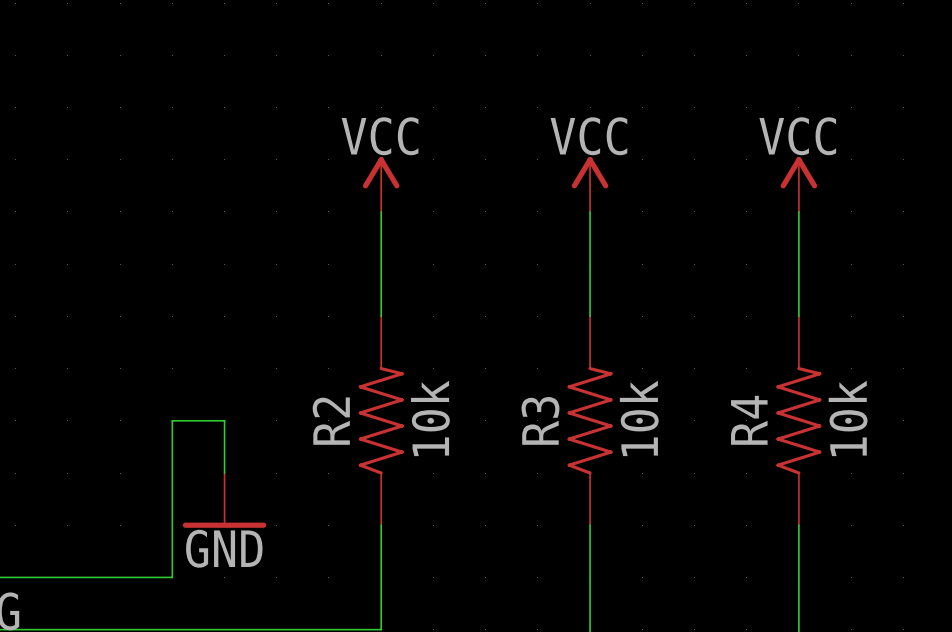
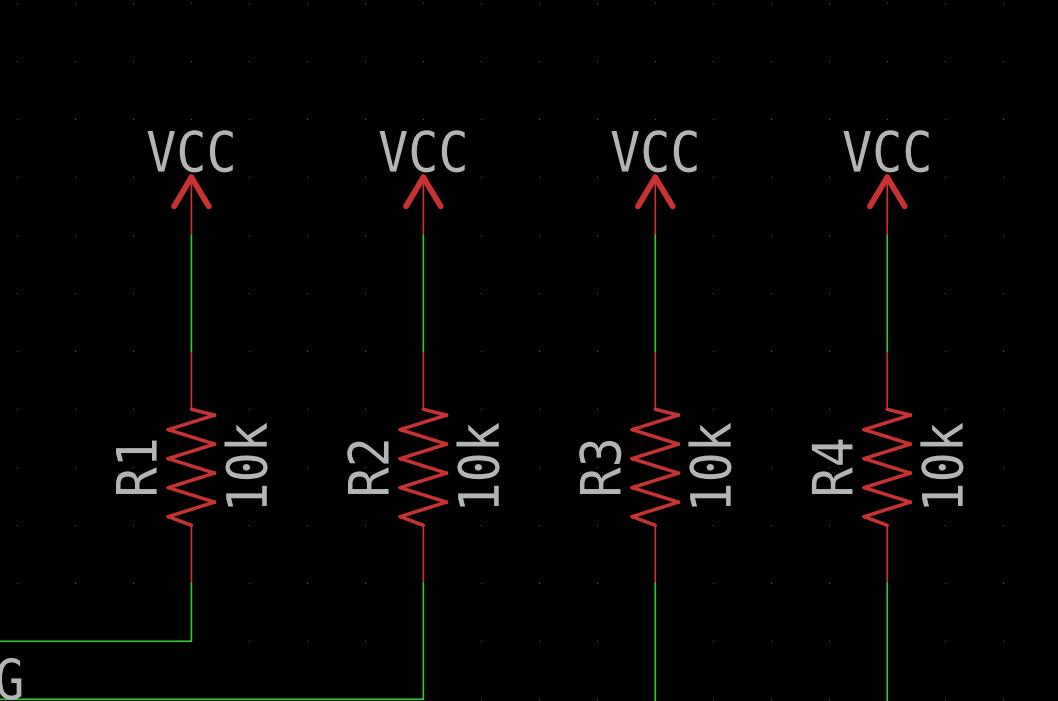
power symbol: none -> VCC (191, 204)
wire: none -> (191, 235) (191, 351)
R1: none -> 10k (191, 467)
wire: (224, 473) (224, 420) (172, 420) (172, 525) -> none
power symbol: GND (224, 500) -> none

